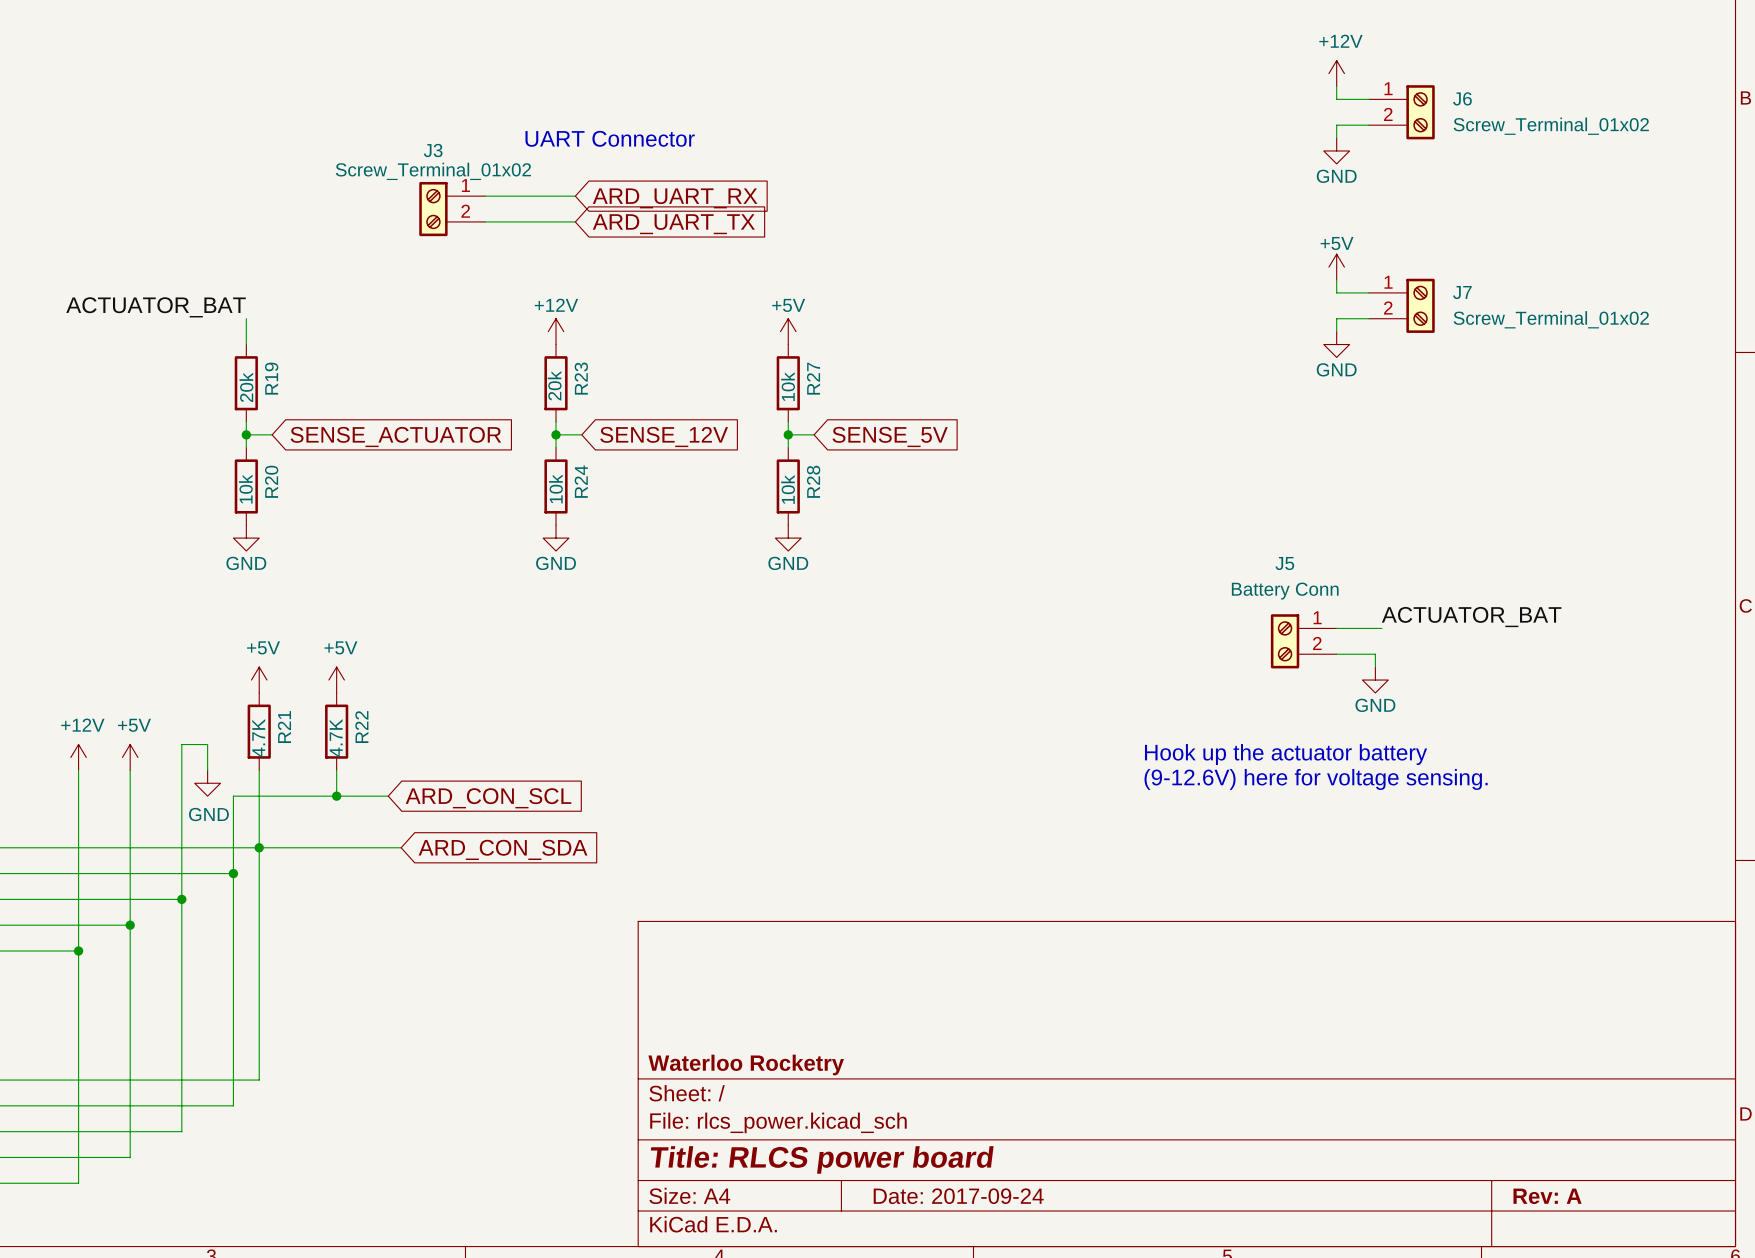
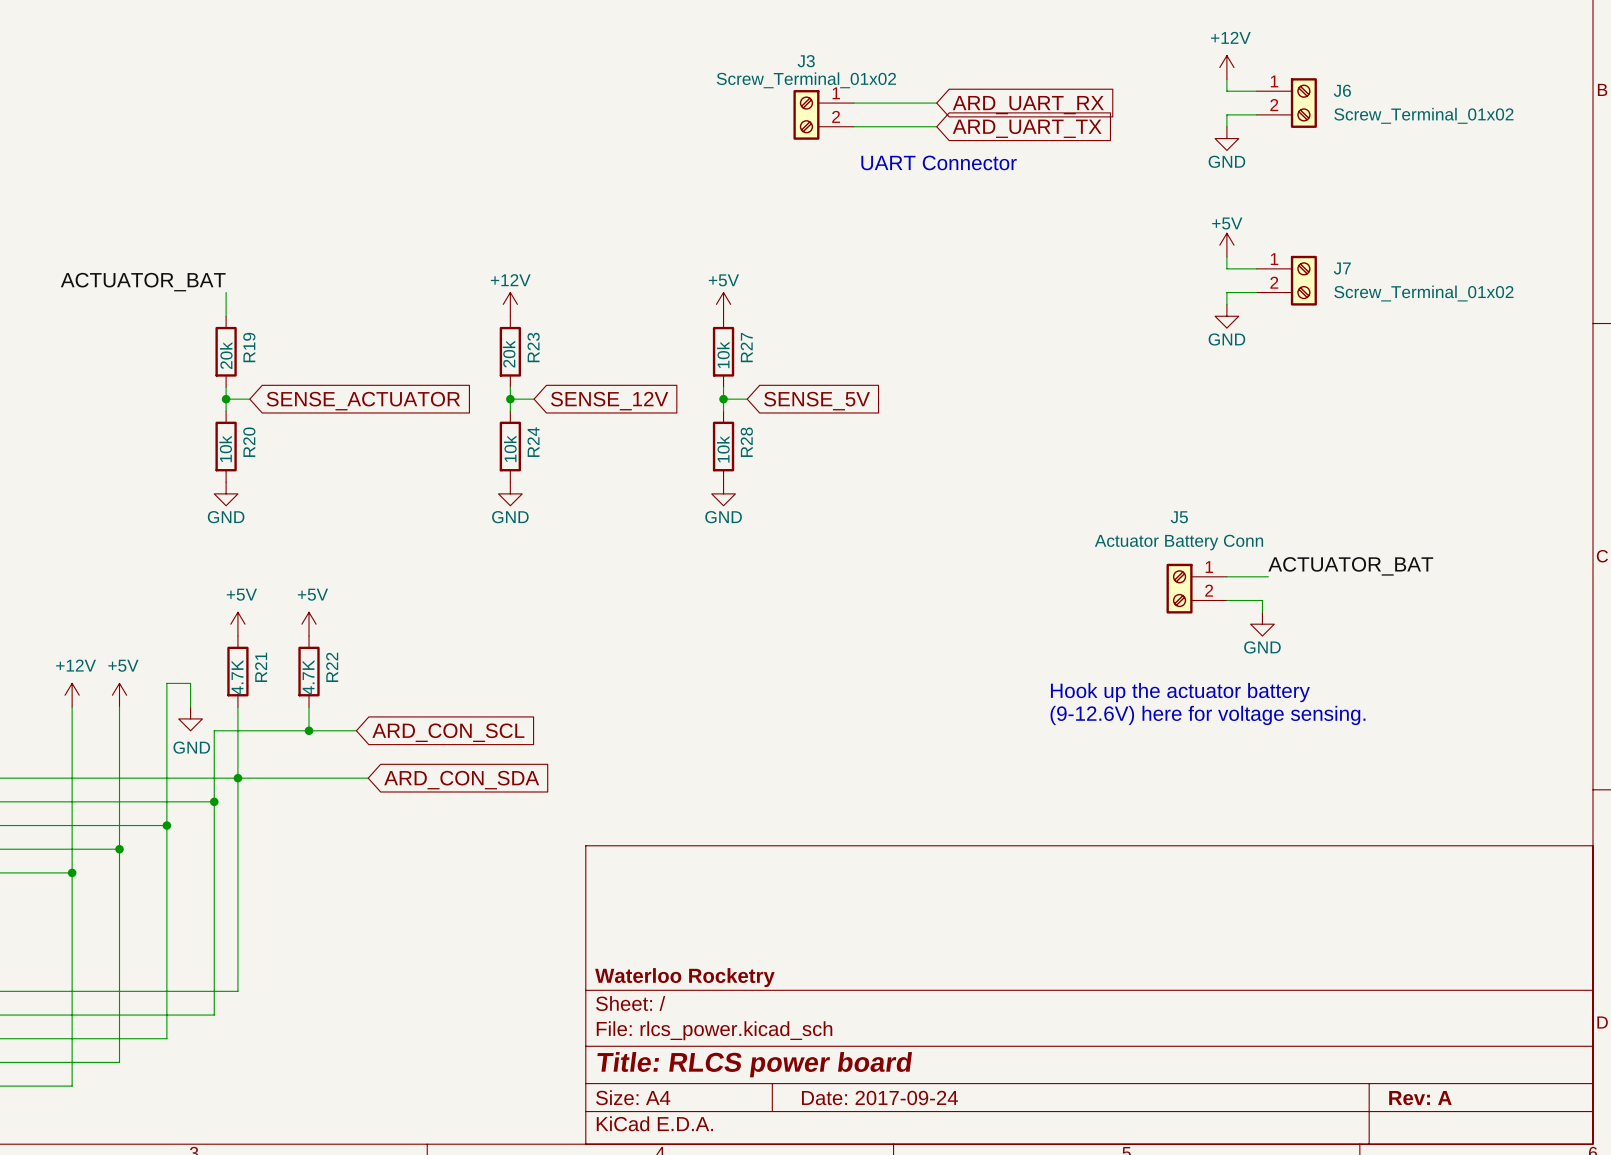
wire: none -> (853, 103) (936, 103)
global label: none -> ARD_UART_RX (1028, 105)
text: UART Connector (610, 138) -> none
wire: none -> (853, 126) (936, 126)
global label: none -> ARD_UART_TX (1027, 128)
text: none -> UART Connector (939, 162)
wire: (485, 196) (575, 196) -> none
global label: ARD_UART_RX (675, 198) -> none
J3 position: (452, 209) -> (823, 114)
wire: (485, 221) (575, 221) -> none
global label: ARD_UART_TX (673, 224) -> none
J5 value: Battery Conn (1285, 591) -> Actuator Battery Conn (1178, 542)

